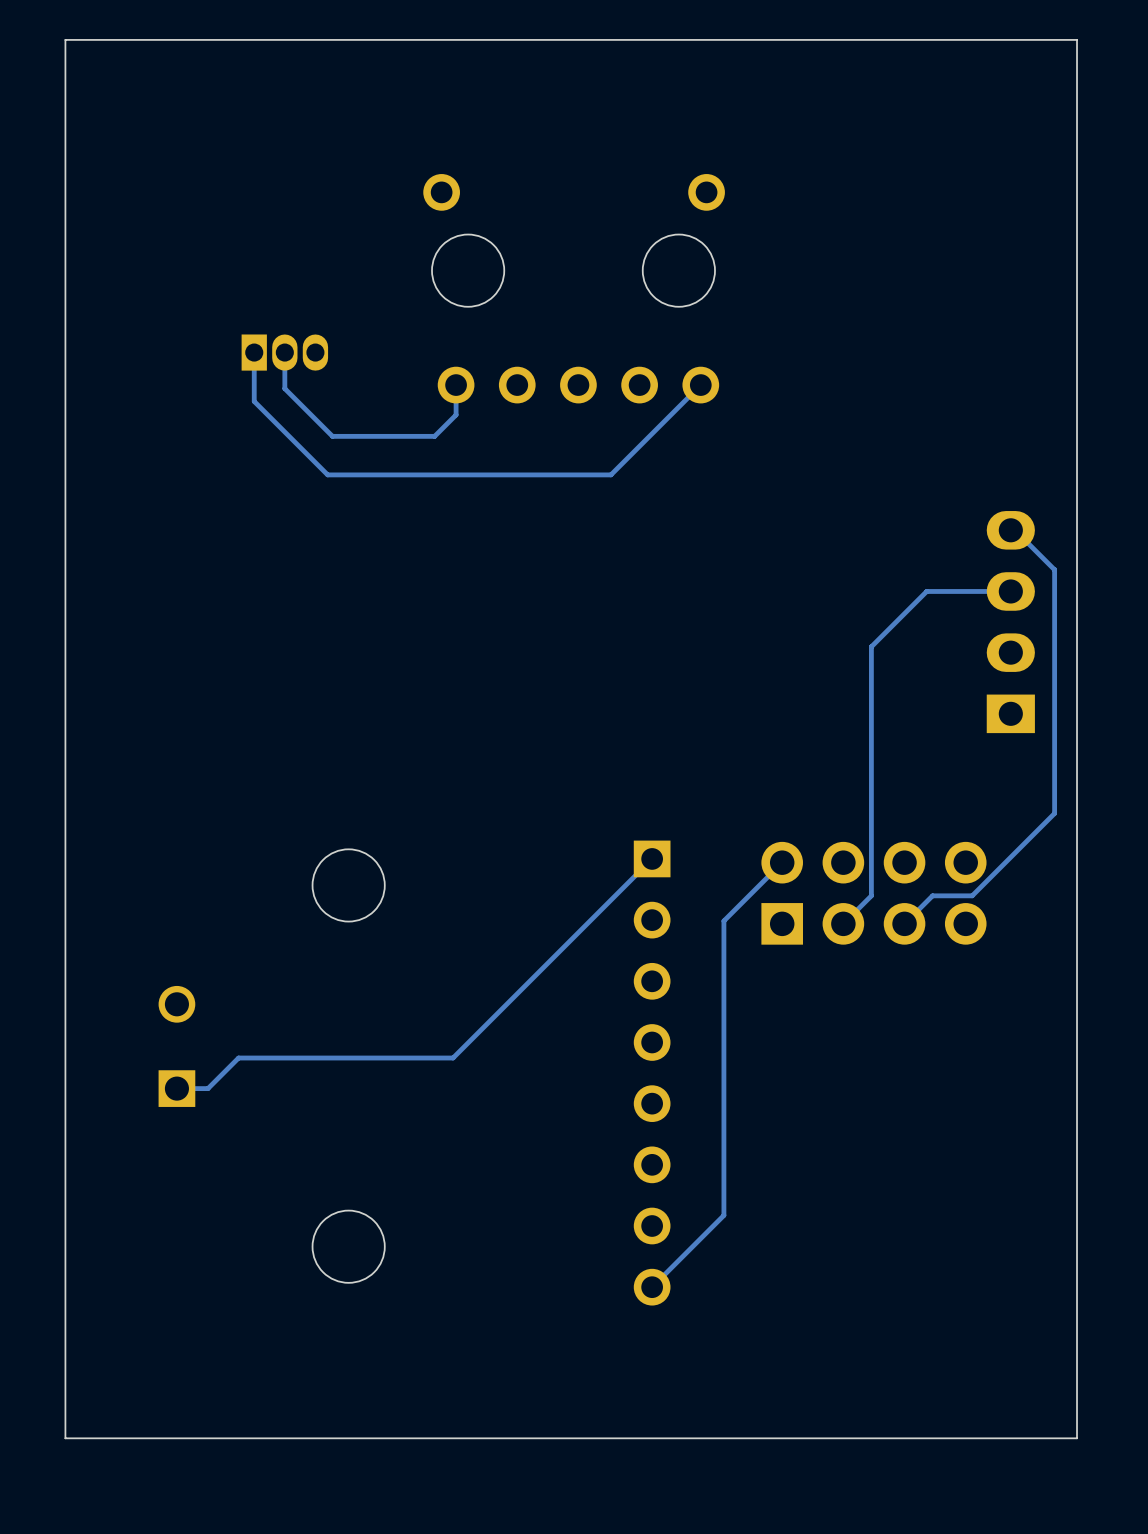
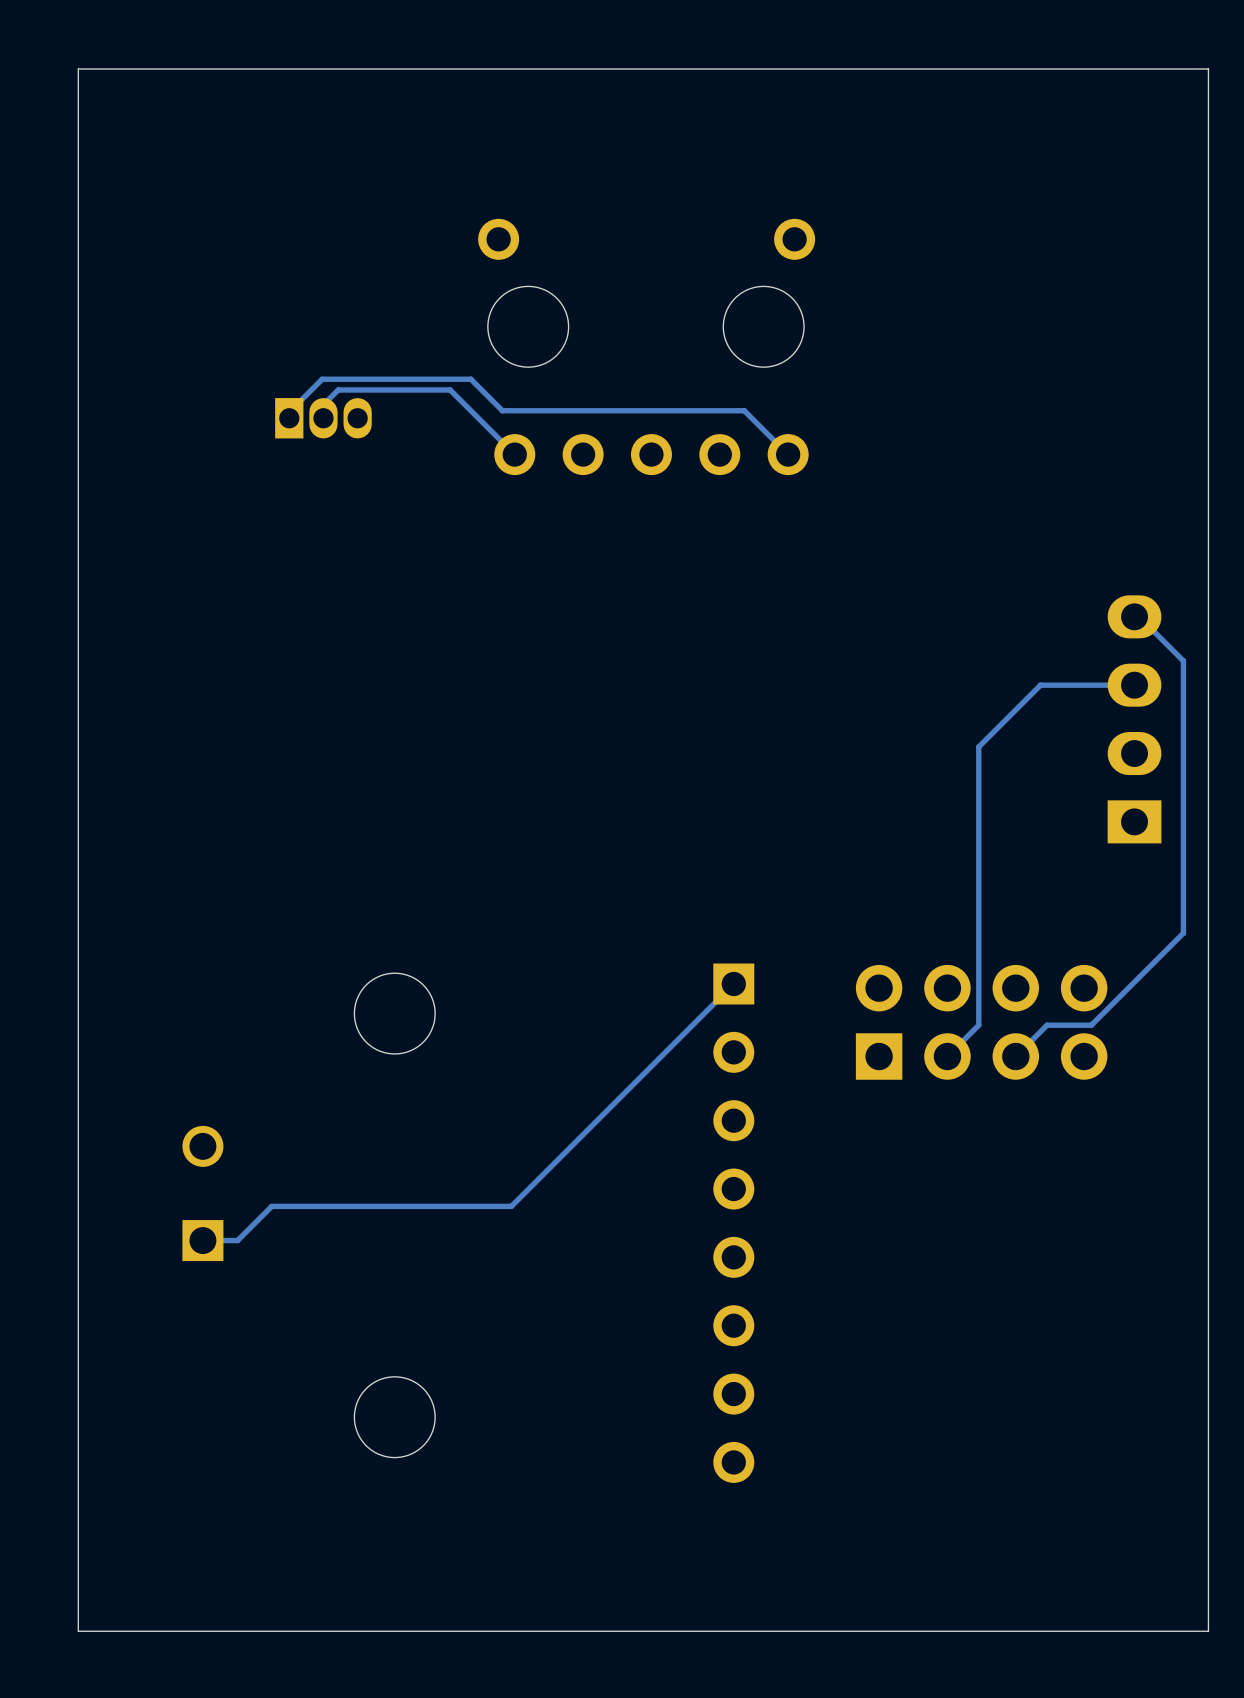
track: (254, 352) (254, 401) (327, 474) (610, 474) (700, 385) -> (289, 418) (289, 412) (322, 379) (470, 379) (502, 410) (744, 410) (788, 454)
track: (284, 352) (284, 388) (332, 436) (434, 436) (456, 414) (456, 385) -> (323, 418) (323, 404) (338, 390) (450, 390) (514, 454)
track: (782, 862) (723, 920) (723, 1215) (652, 1287) -> none

